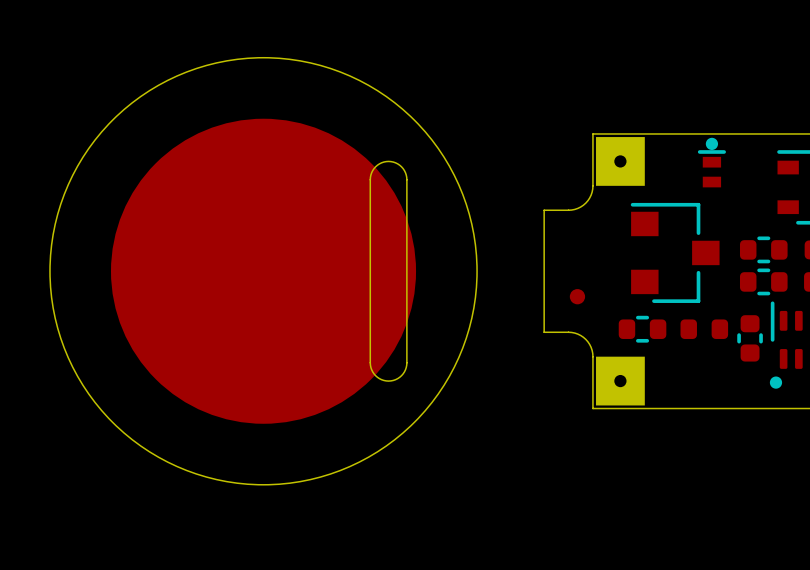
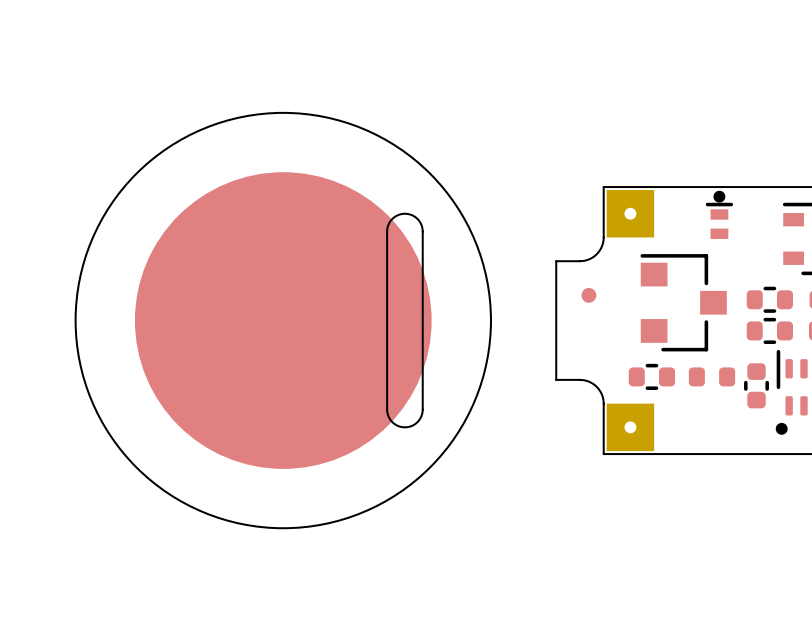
part position: (577, 296) -> (588, 295)

